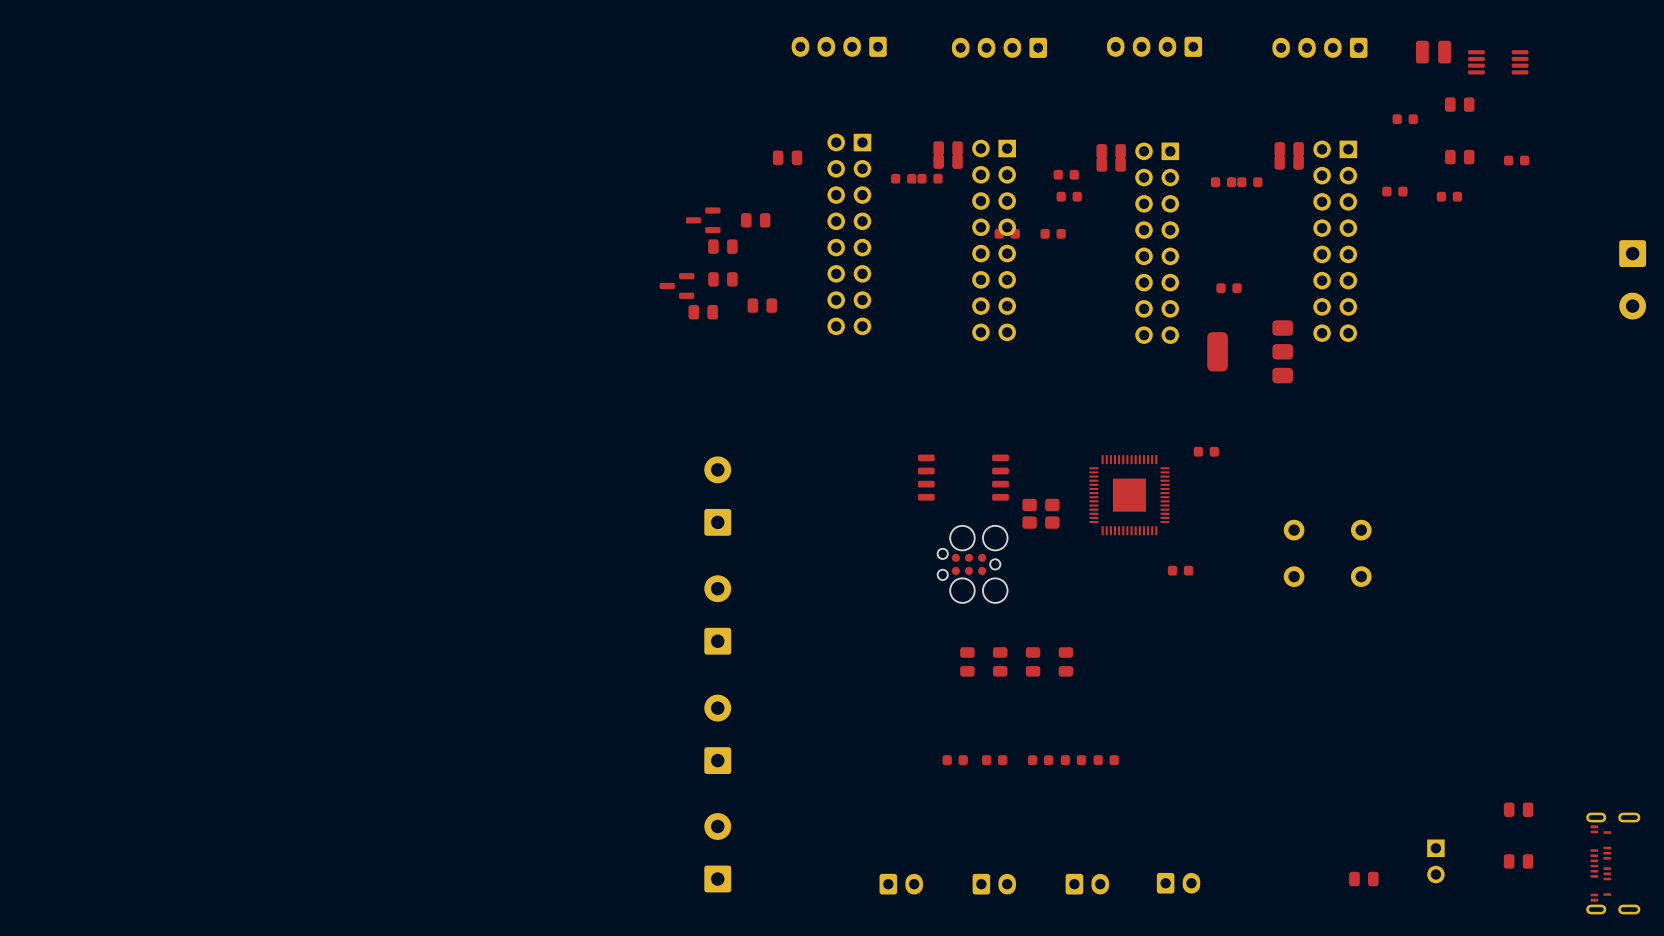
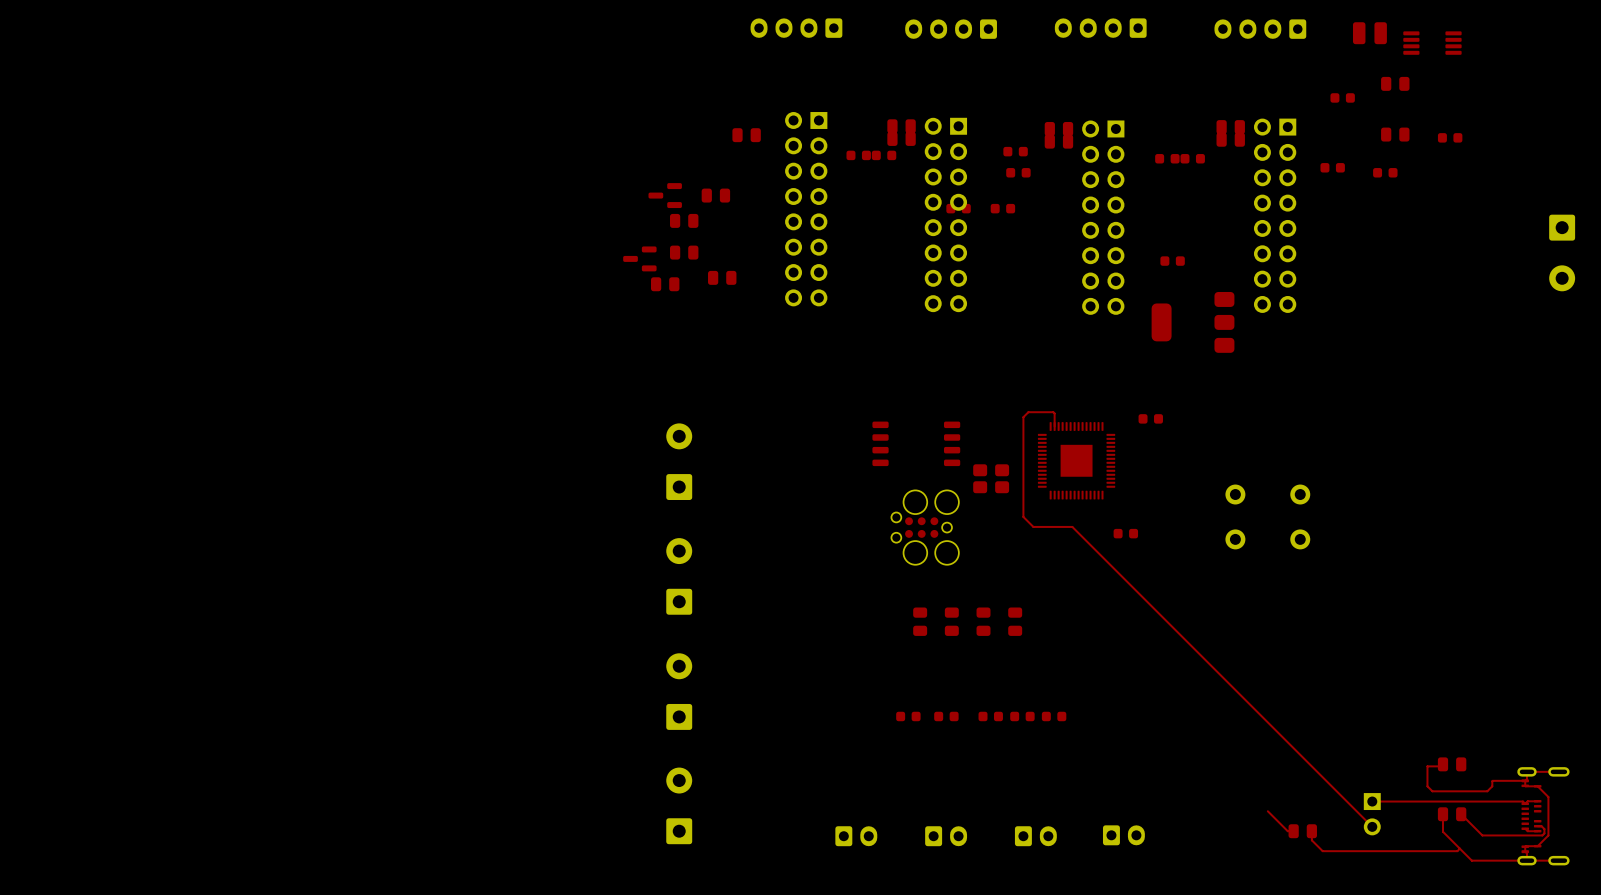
top track: none -> (1054, 426) (1053, 412) (1028, 412) (1023, 417) (1023, 516) (1033, 526) (1072, 526) (1372, 826)
top track: none -> (1443, 764) (1441, 766) (1427, 766) (1427, 786) (1432, 791) (1487, 791) (1492, 786) (1492, 780) (1525, 780)
top track: none -> (1558, 771) (1526, 771) (1525, 780)
top track: none -> (1525, 780) (1525, 786) (1537, 786) (1548, 797) (1548, 835) (1537, 846) (1525, 846) (1526, 860)
top track: none -> (1537, 801) (1527, 801) (1525, 803) (1522, 801) (1372, 801)
top track: none -> (1267, 811) (1287, 831) (1293, 831)
top track: none -> (1443, 814) (1443, 831) (1471, 860) (1558, 860)
top track: none -> (1461, 814) (1482, 835) (1542, 835) (1544, 829) (1541, 826) (1537, 826)
top track: none -> (1525, 828) (1527, 831) (1537, 831)
top track: none -> (1311, 831) (1311, 840) (1322, 851) (1457, 851) (1459, 848)

